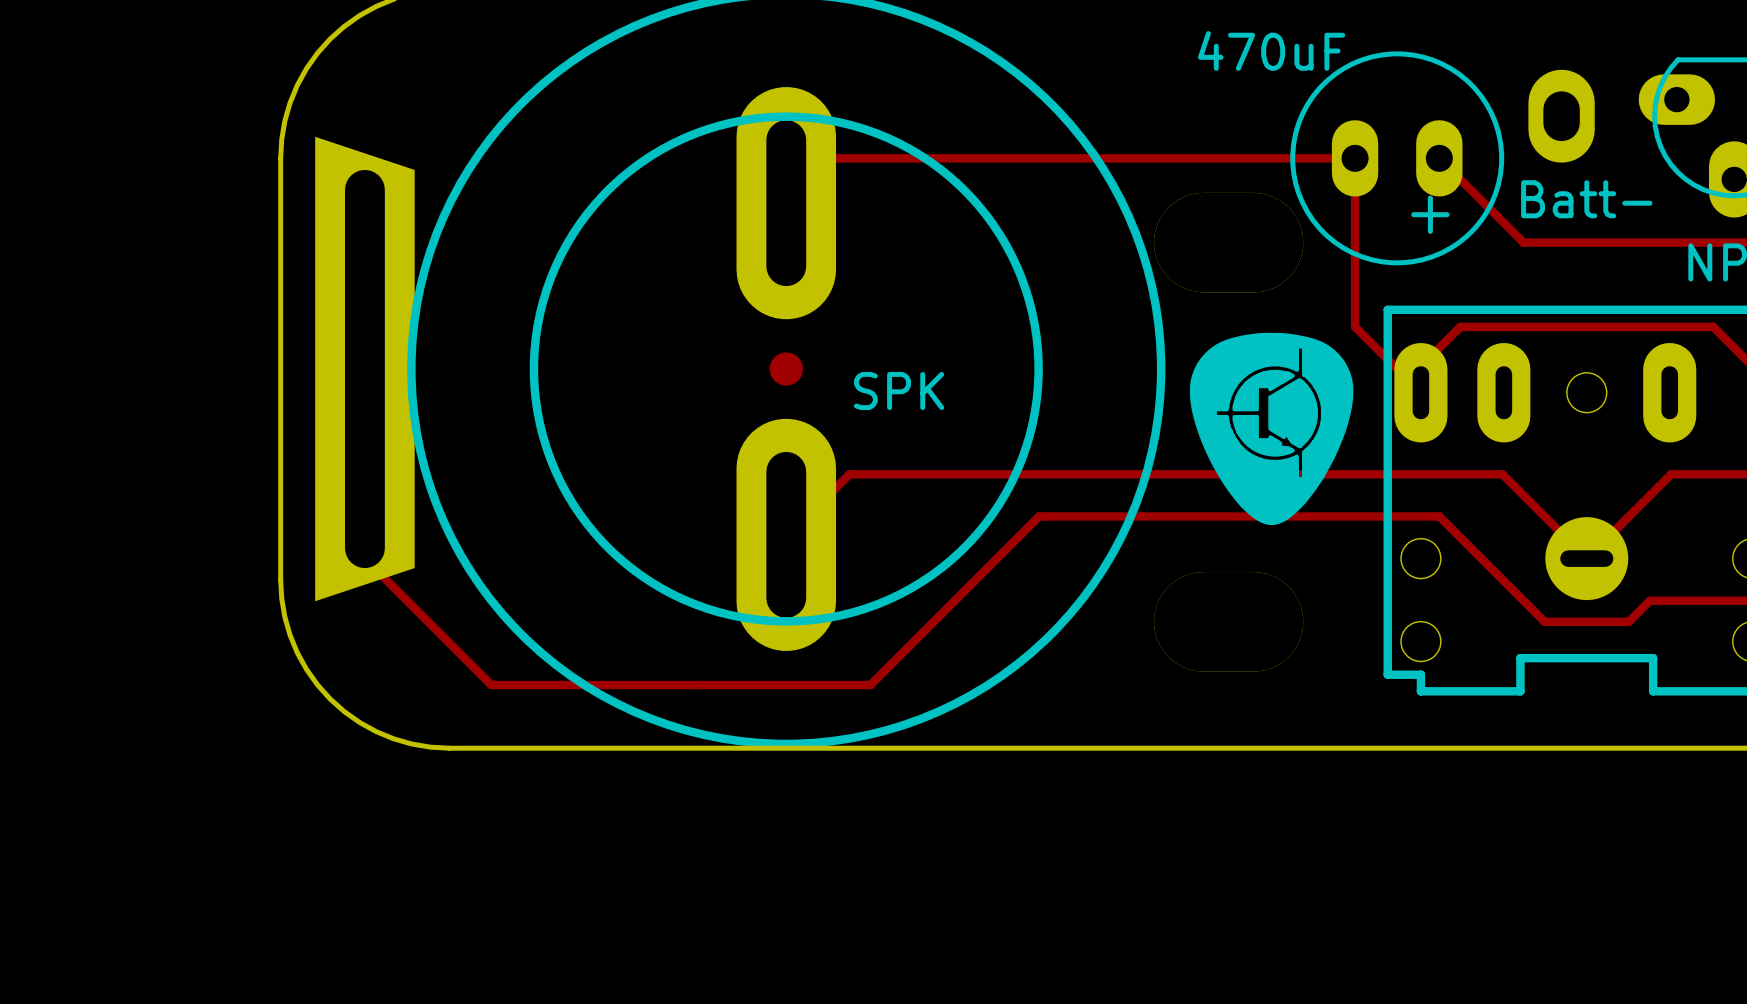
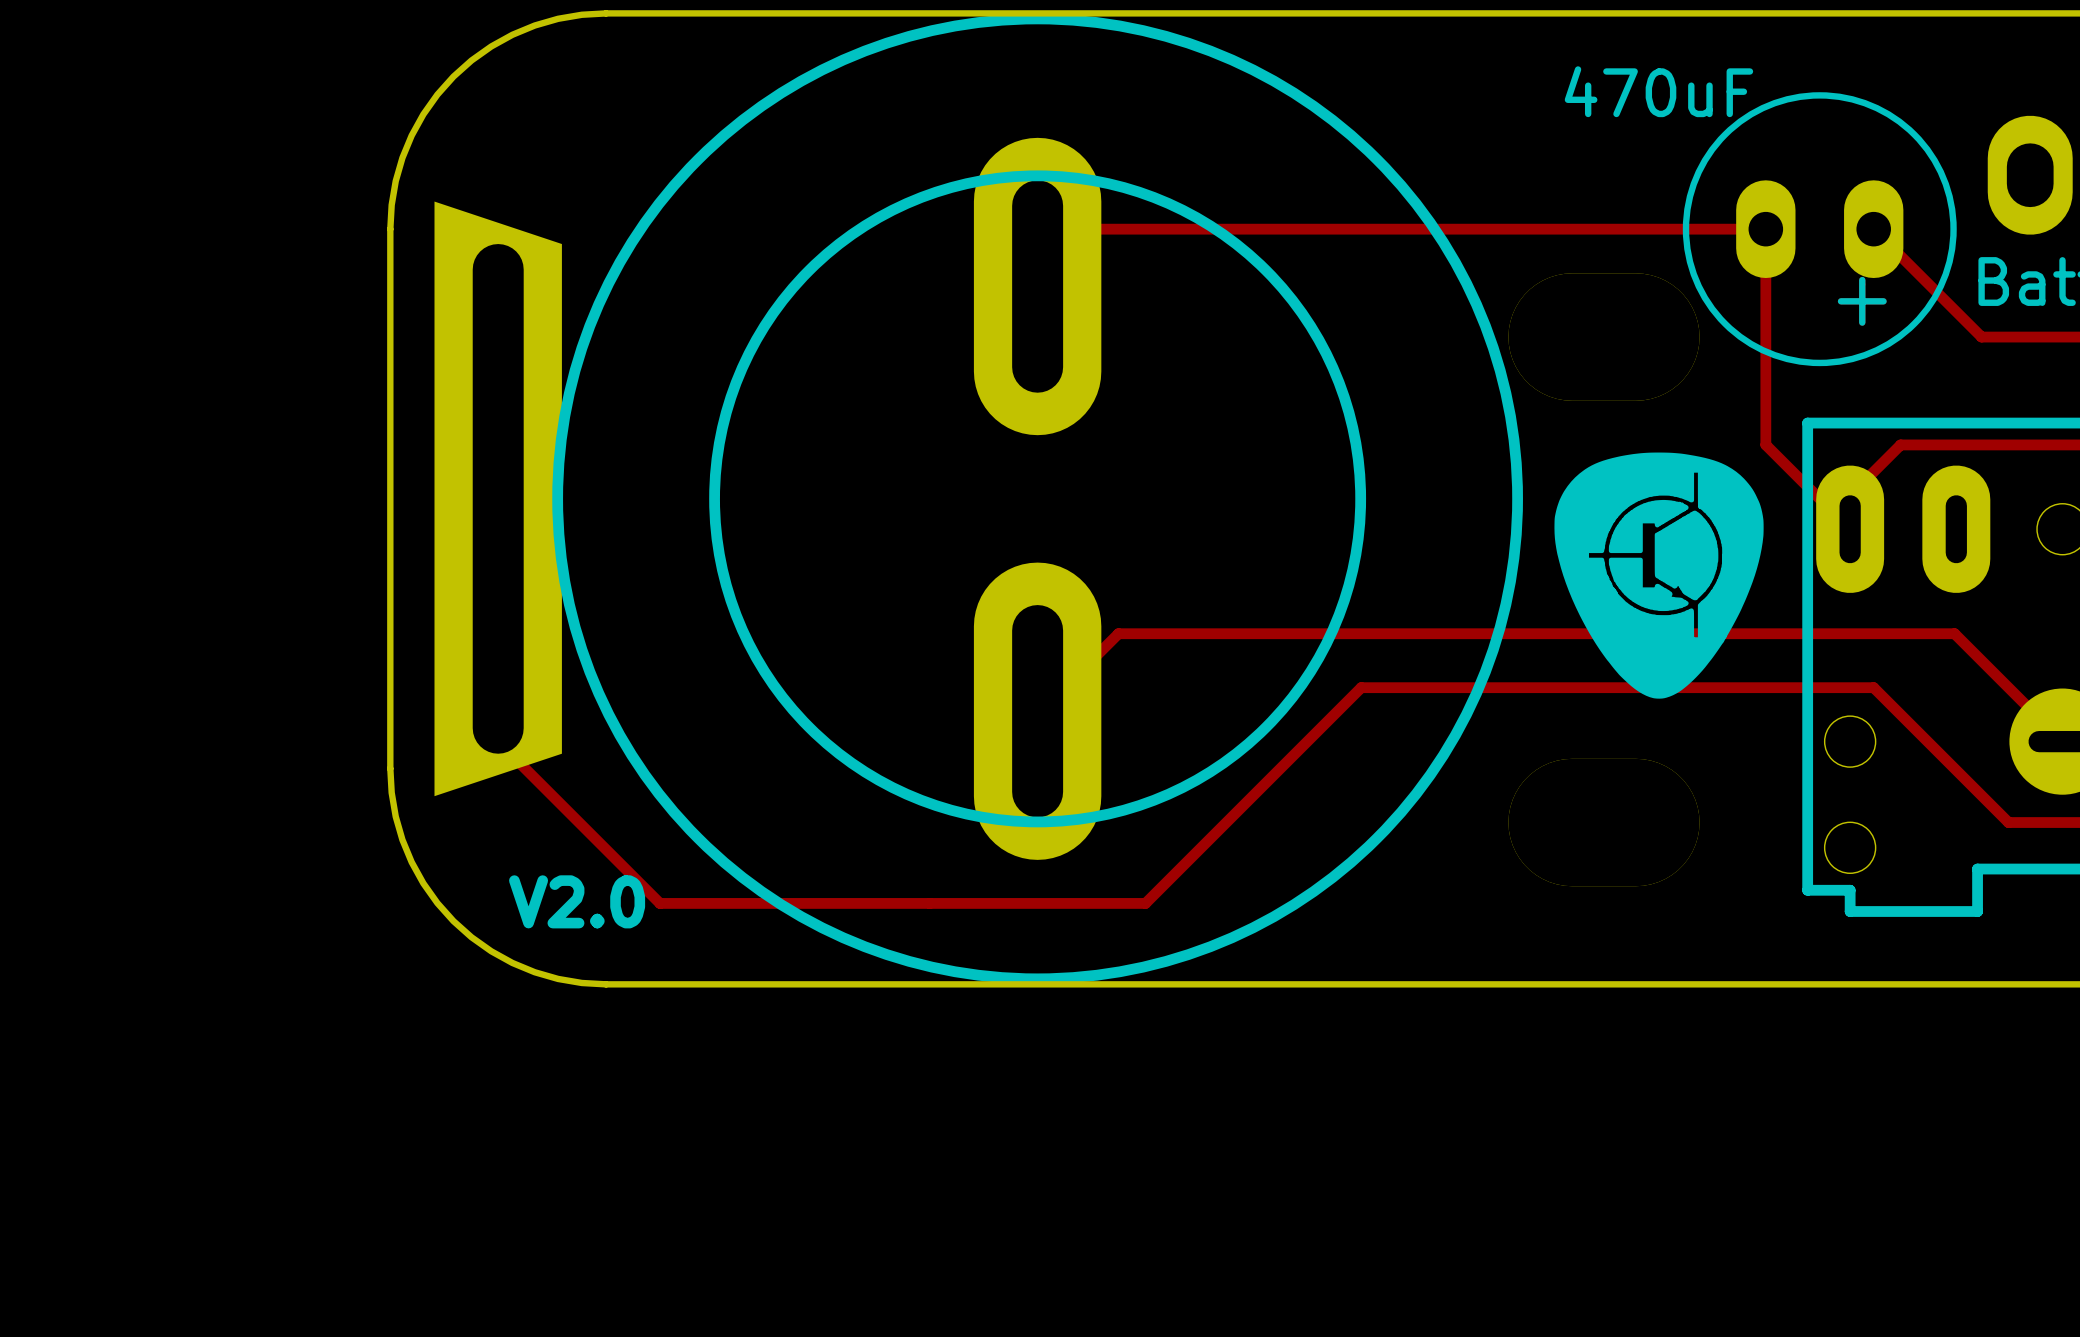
SPK: (786, 369) -> none
text: none -> V2.0 (577, 901)

